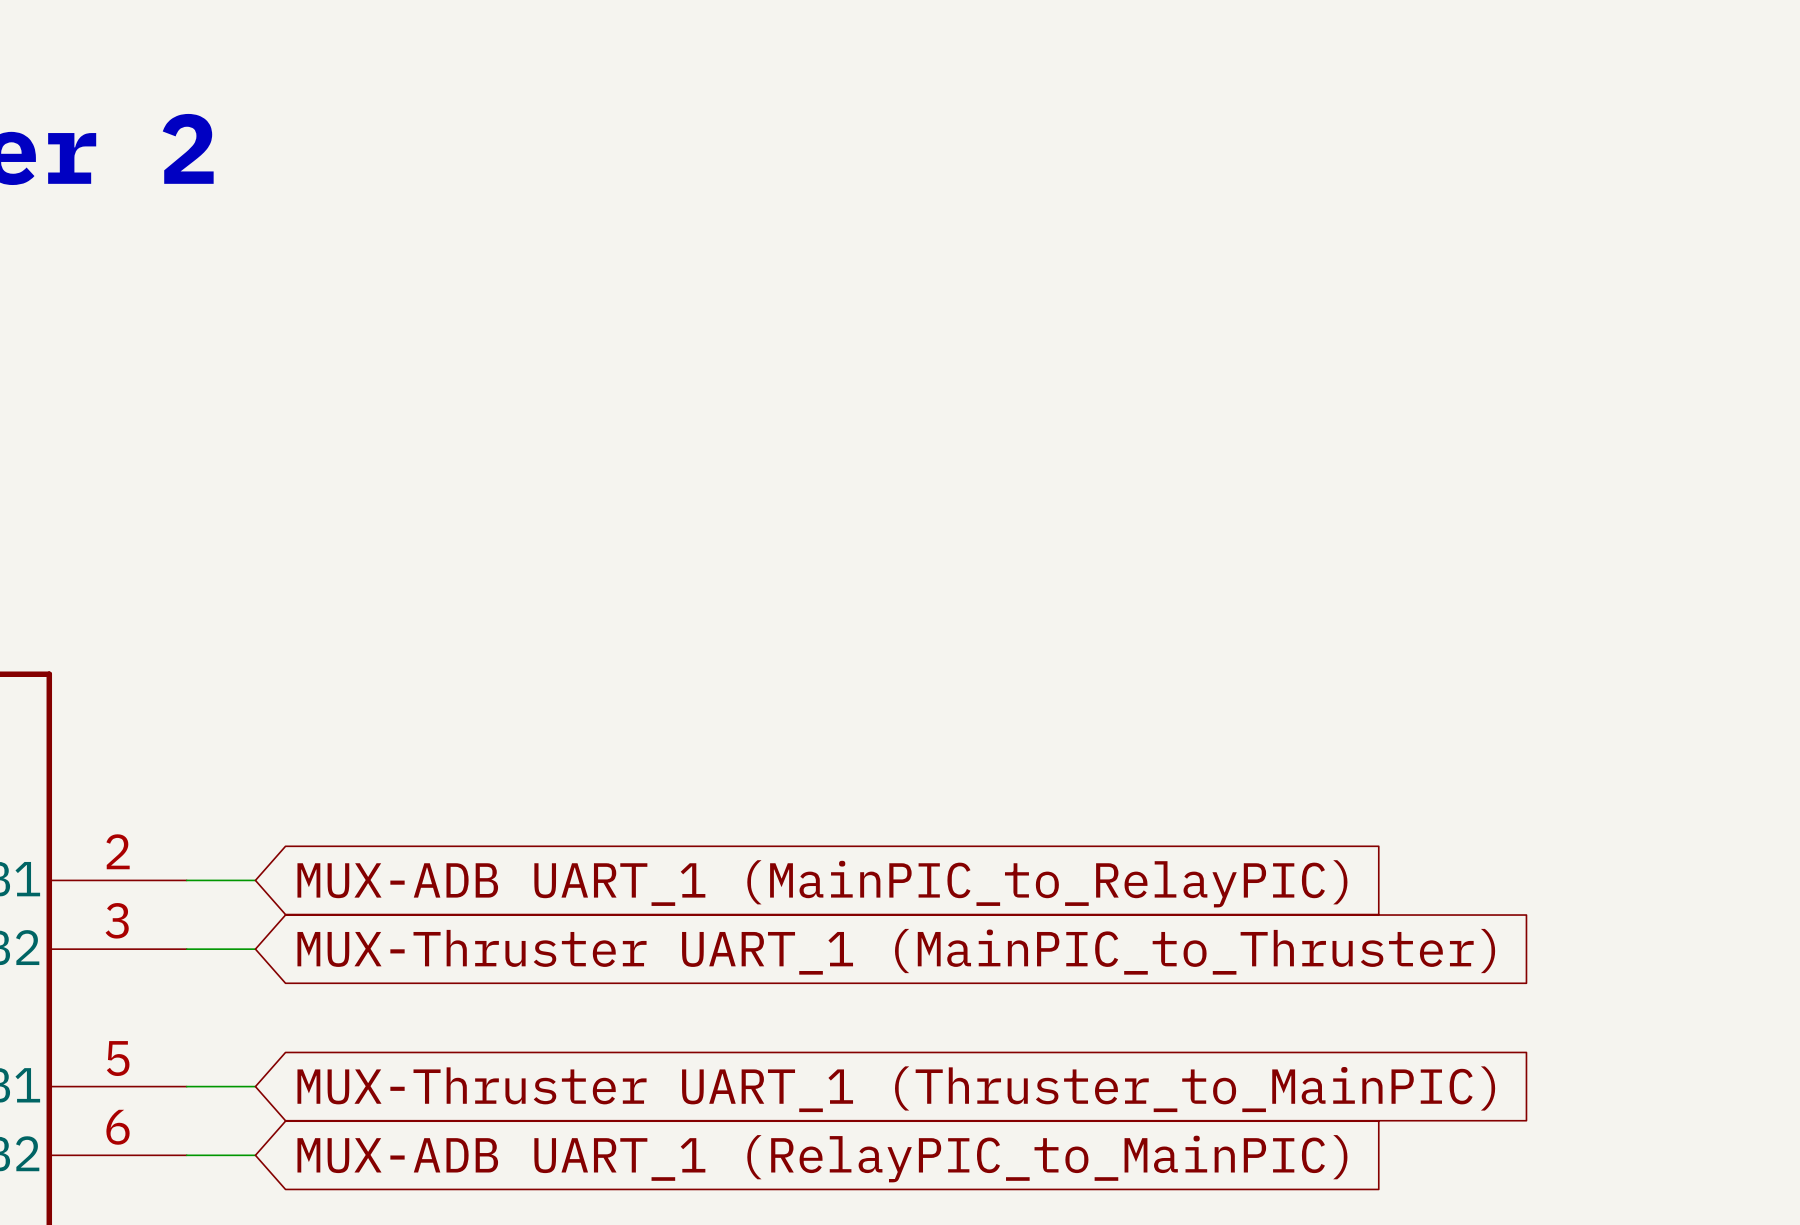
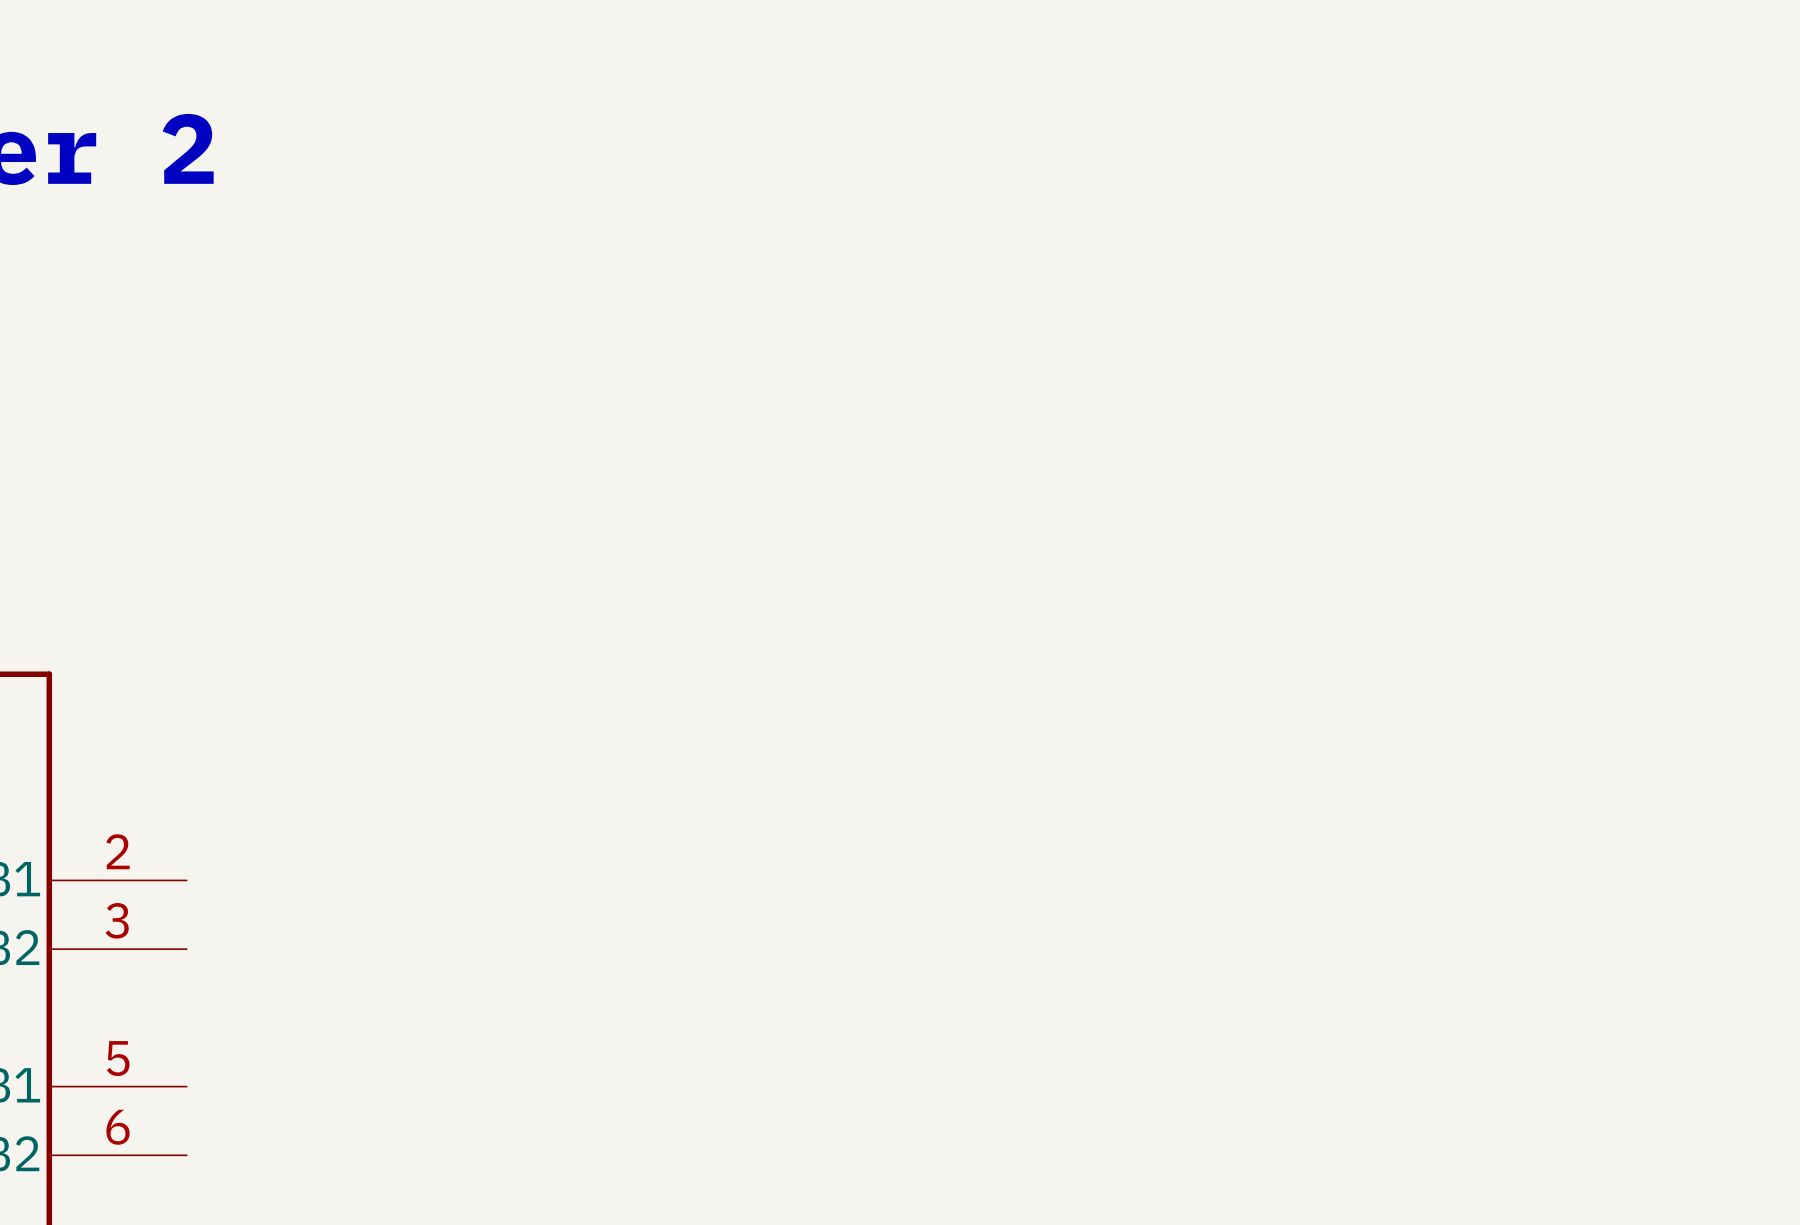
wire: (186, 880) (255, 880) -> none
global label: MUX-ADB UART_1 (MainPIC_to_RelayPIC) (822, 883) -> none
wire: (186, 949) (255, 949) -> none
global label: MUX-Thruster UART_1 (MainPIC_to_Thruster) (896, 951) -> none
wire: (186, 1086) (255, 1086) -> none
global label: MUX-Thruster UART_1 (Thruster_to_MainPIC) (896, 1089) -> none
wire: (186, 1155) (255, 1155) -> none
global label: MUX-ADB UART_1 (RelayPIC_to_MainPIC) (822, 1158) -> none

